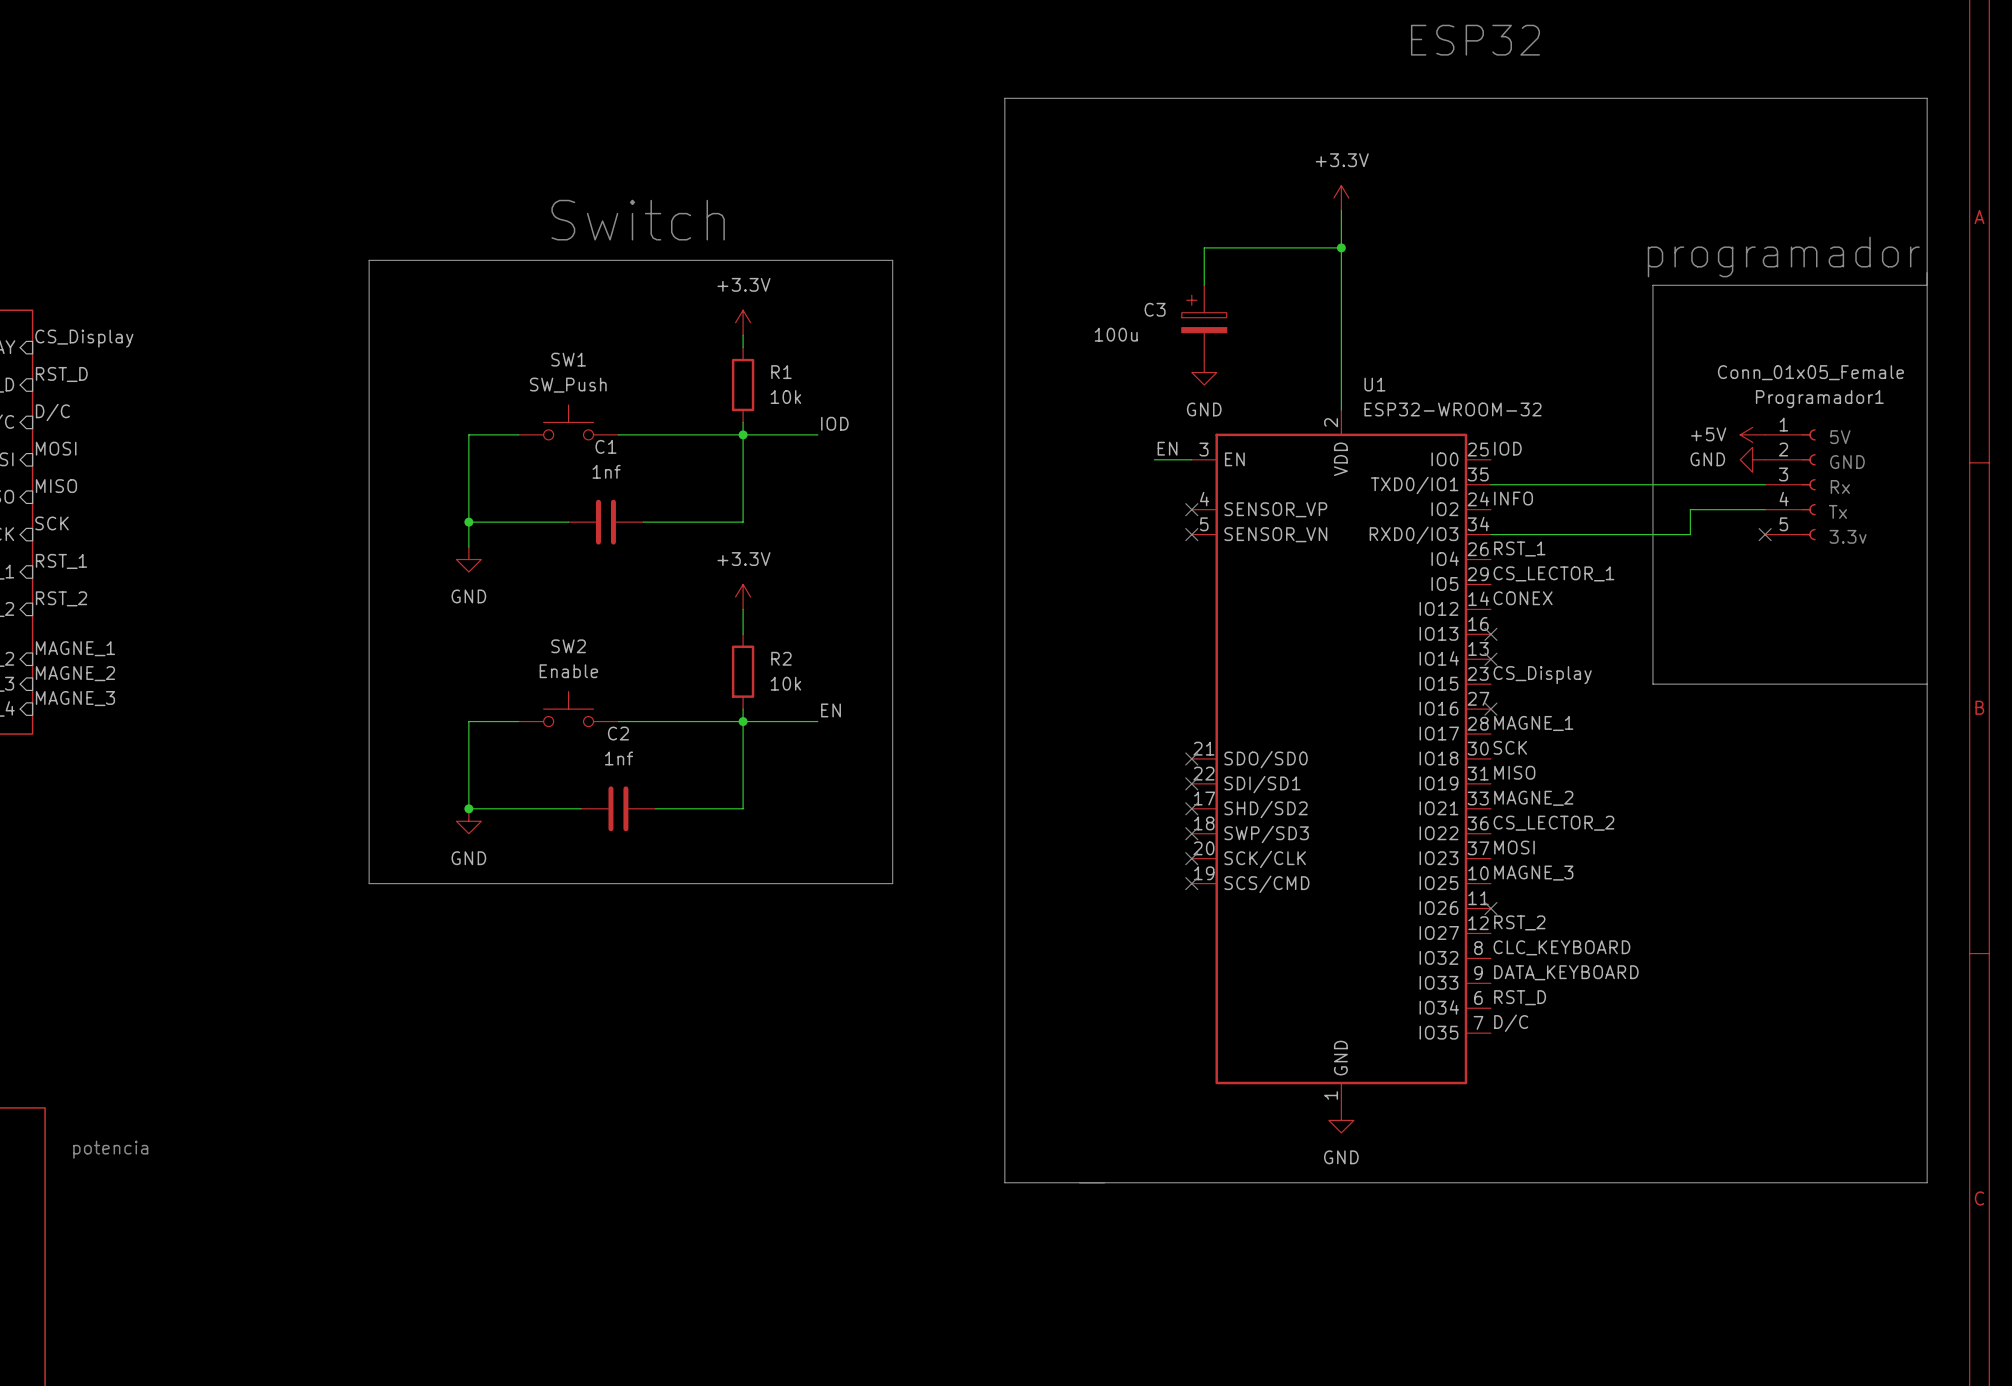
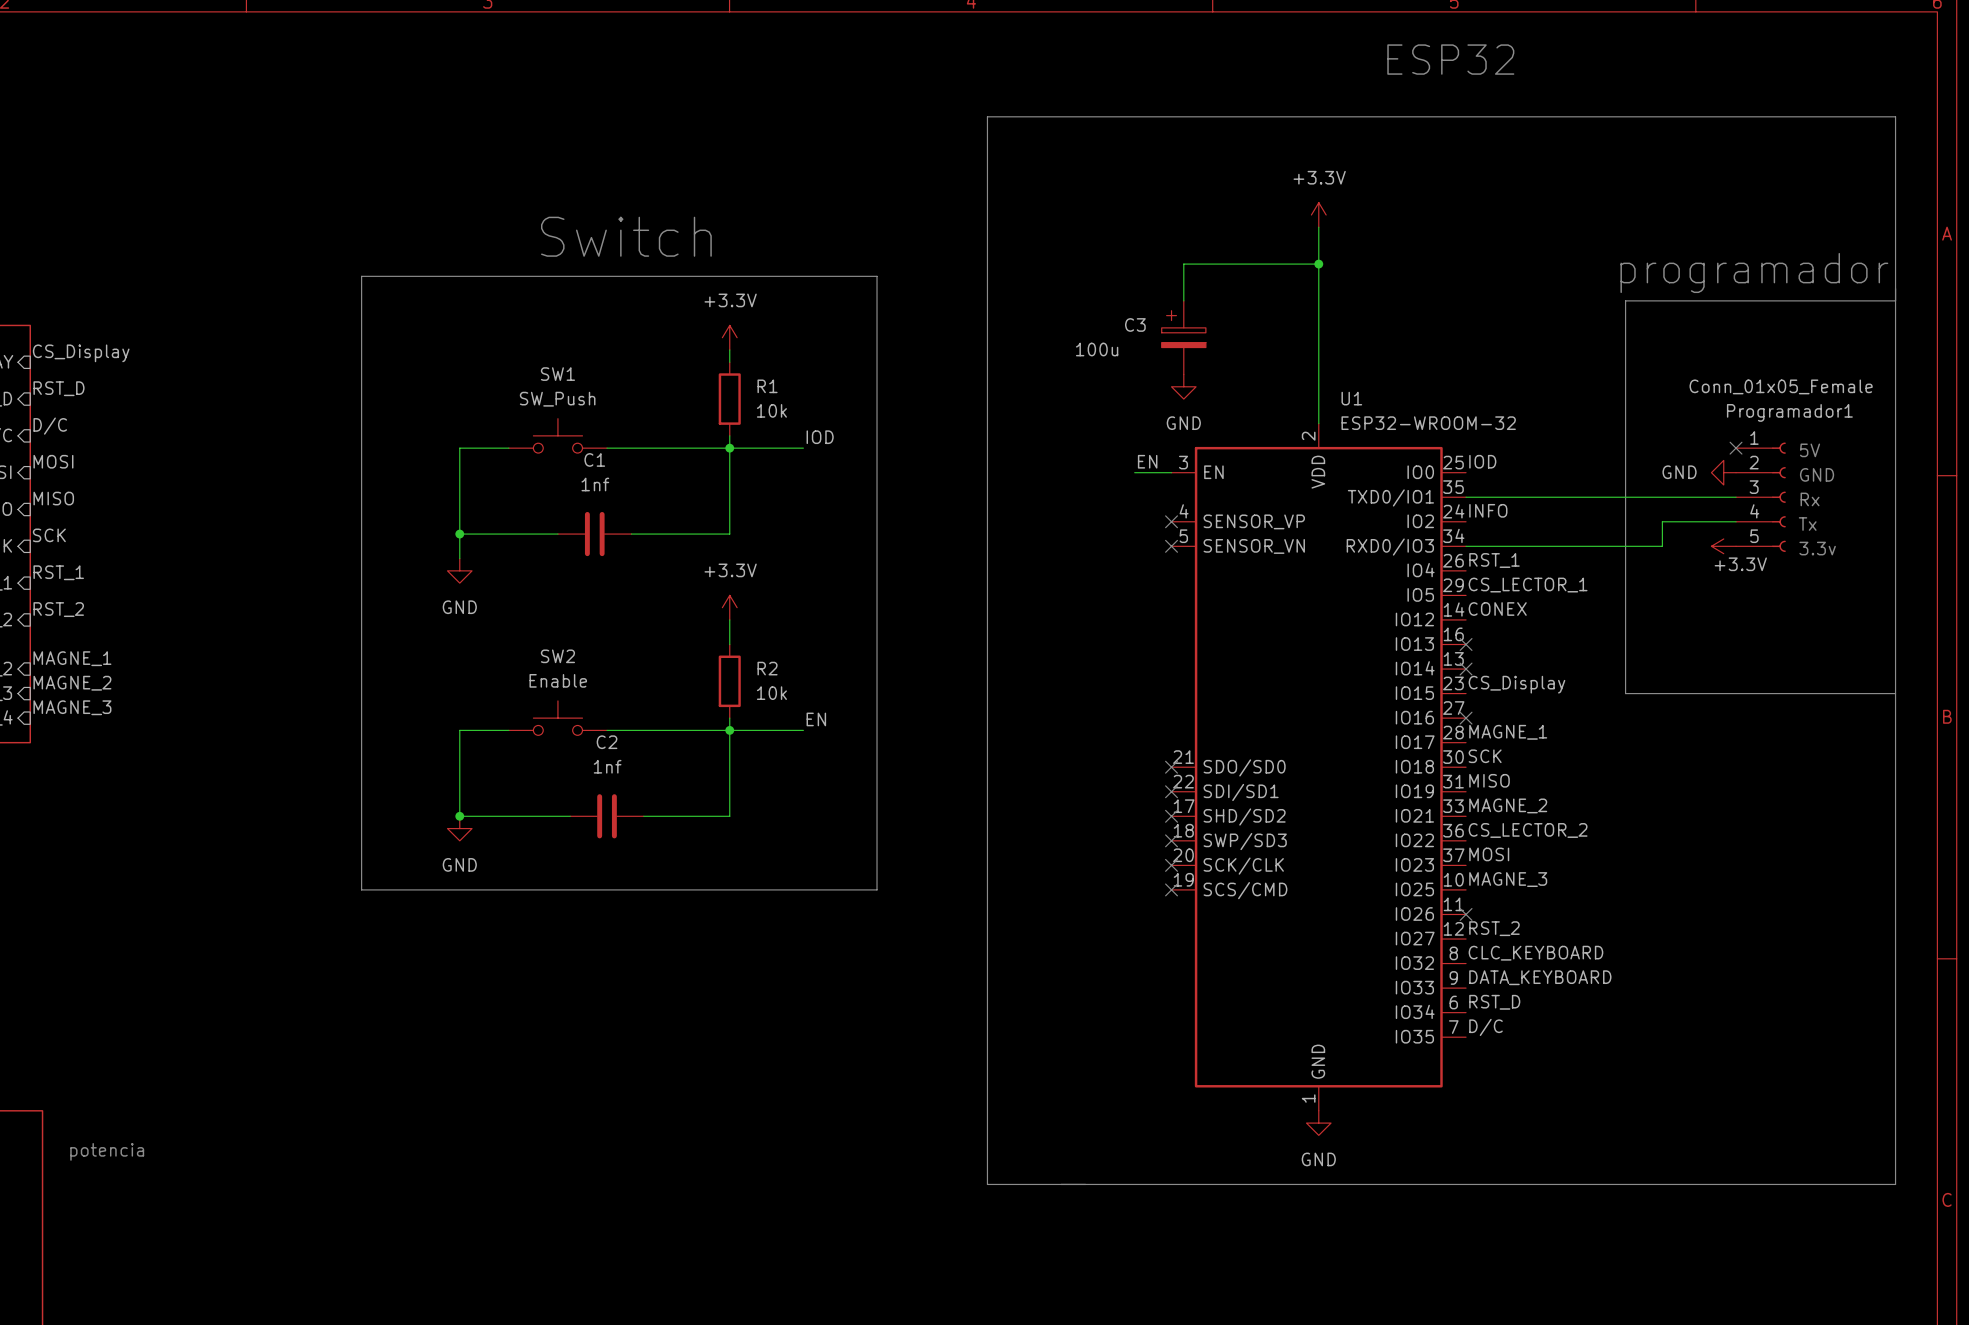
power symbol: +5V (1752, 434) -> none
no-connect mark: none -> (1736, 448)
power symbol: none -> +3.3V (1723, 546)
no-connect mark: (1765, 534) -> none

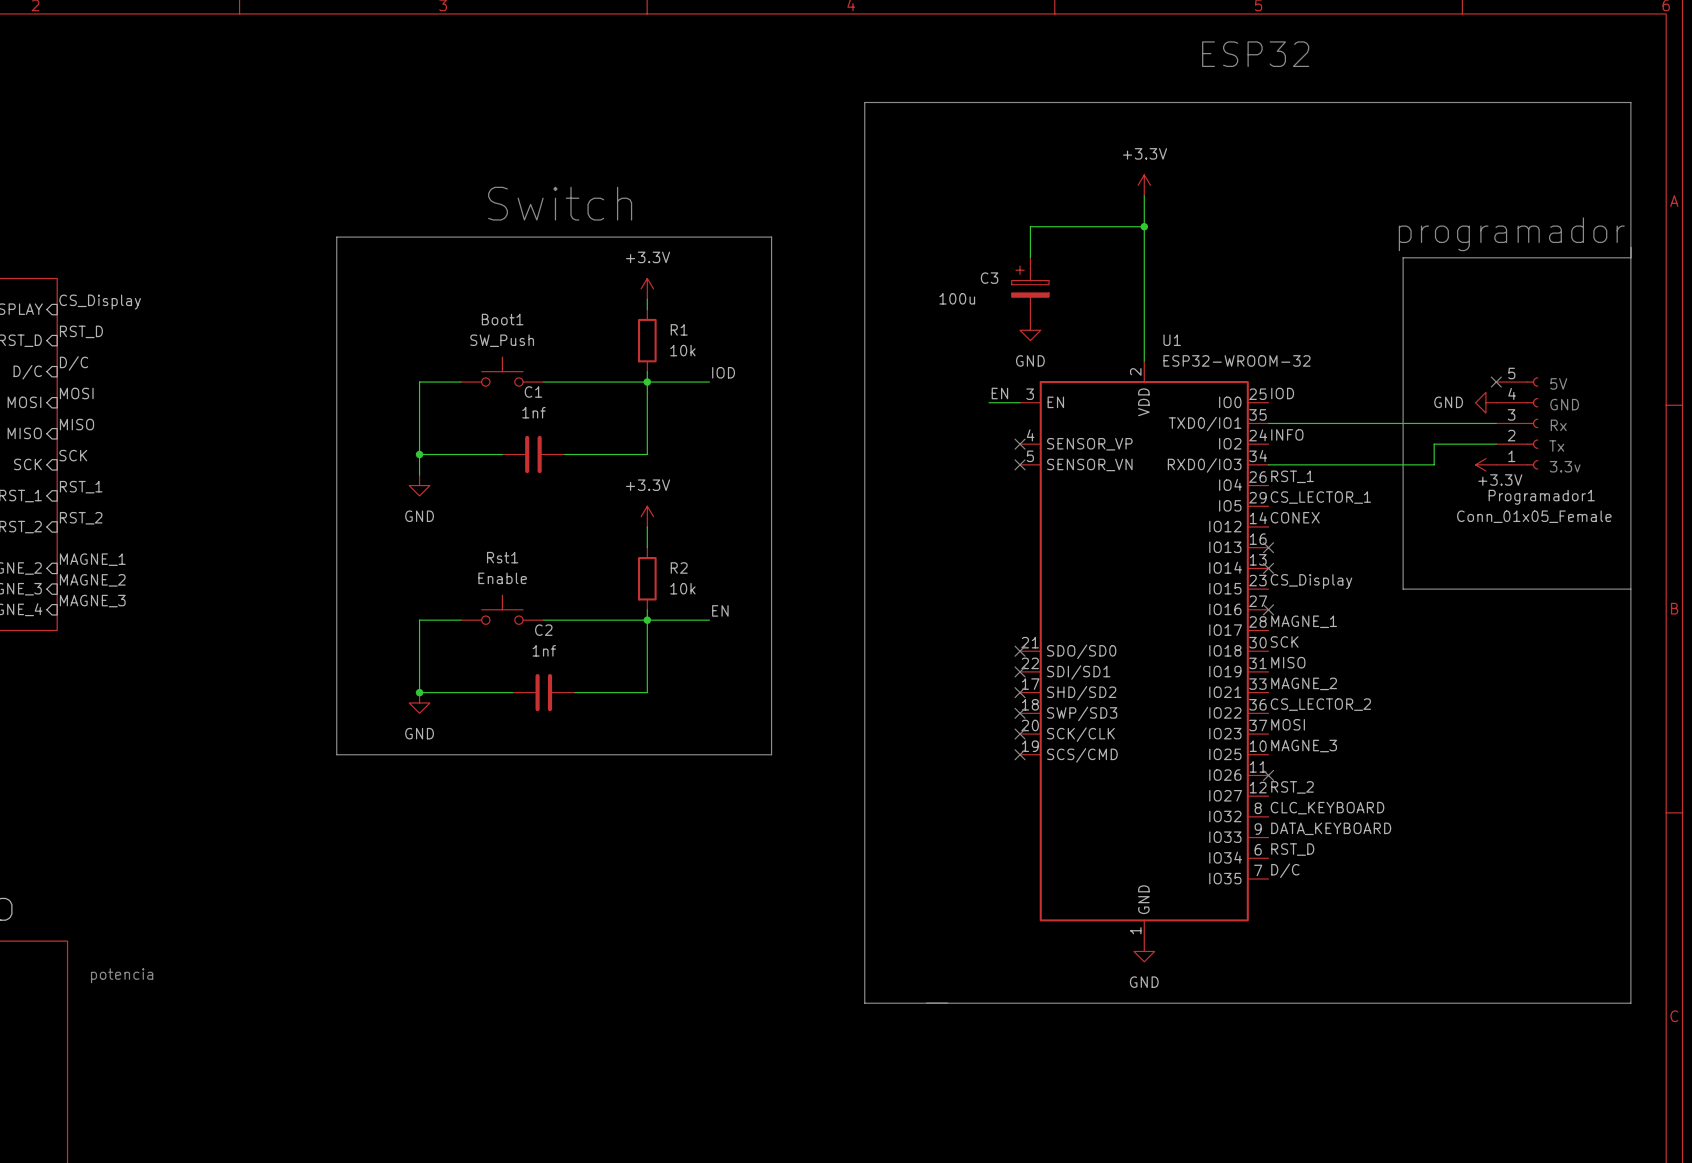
SW1 name: SW1 (557, 374) -> Boot1 (502, 319)
Programador1 flip: as is (1778, 497) -> up-down (1532, 423)
SW2 name: SW2 (557, 656) -> Rst1 (502, 557)

